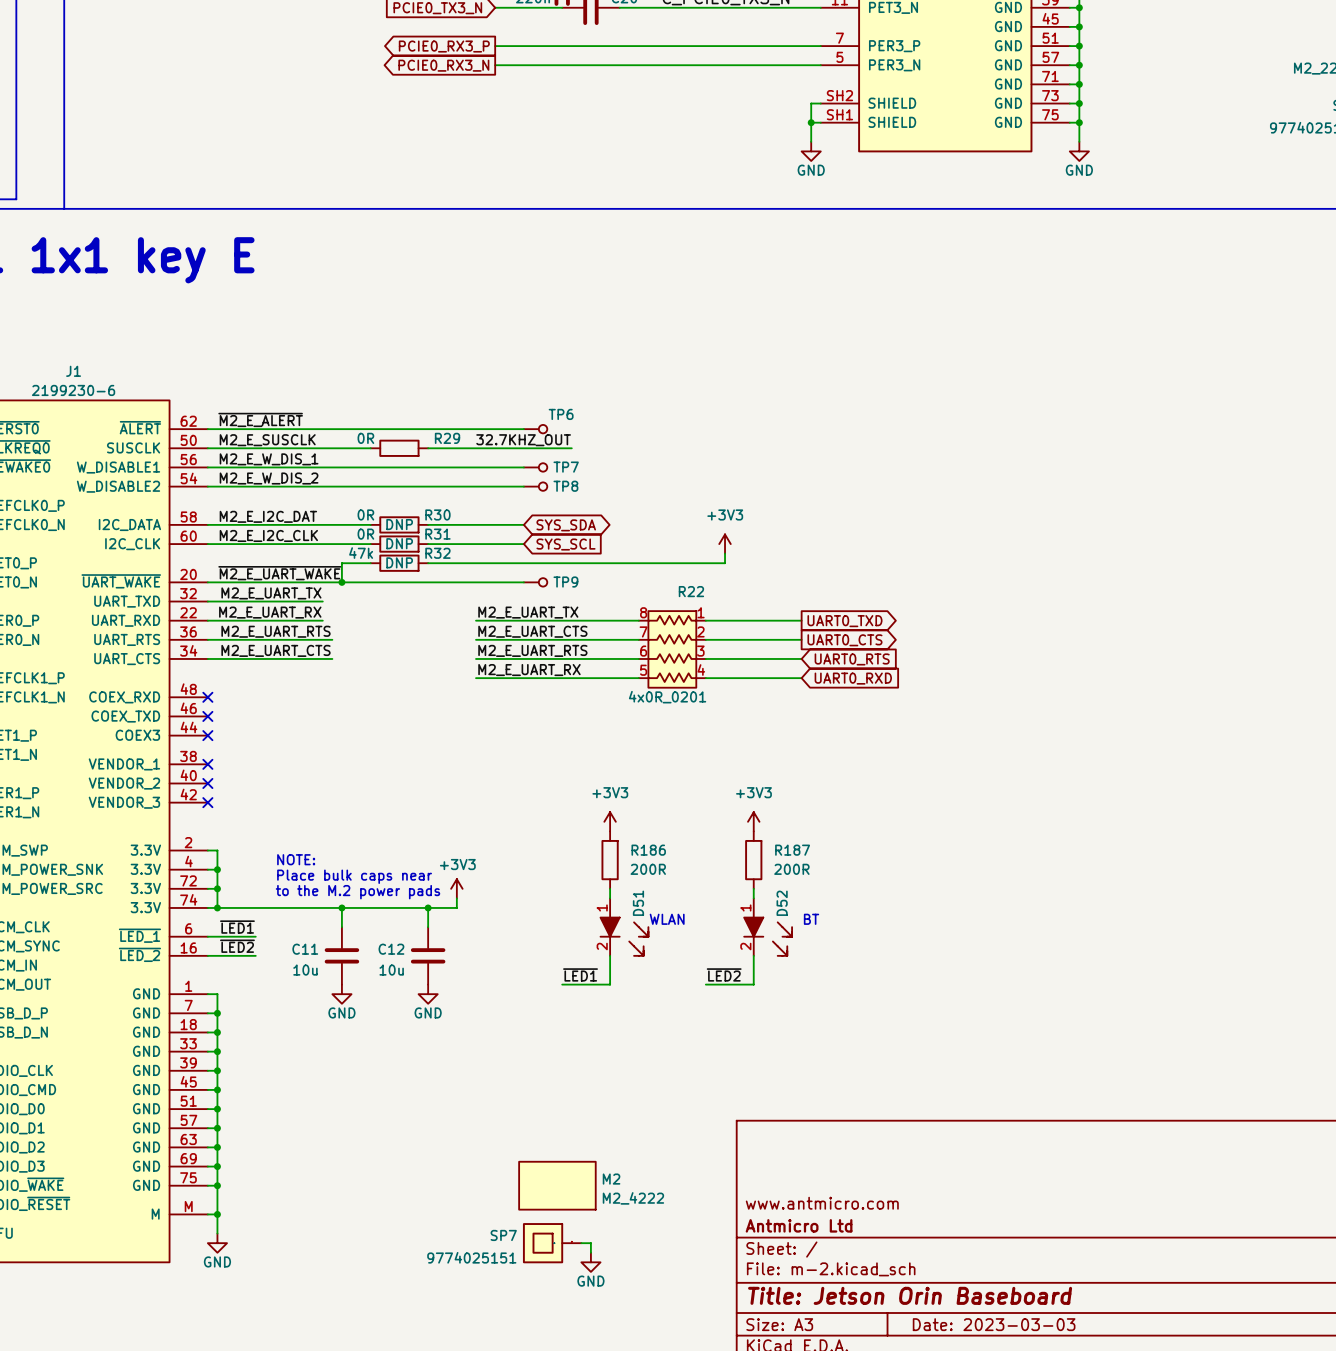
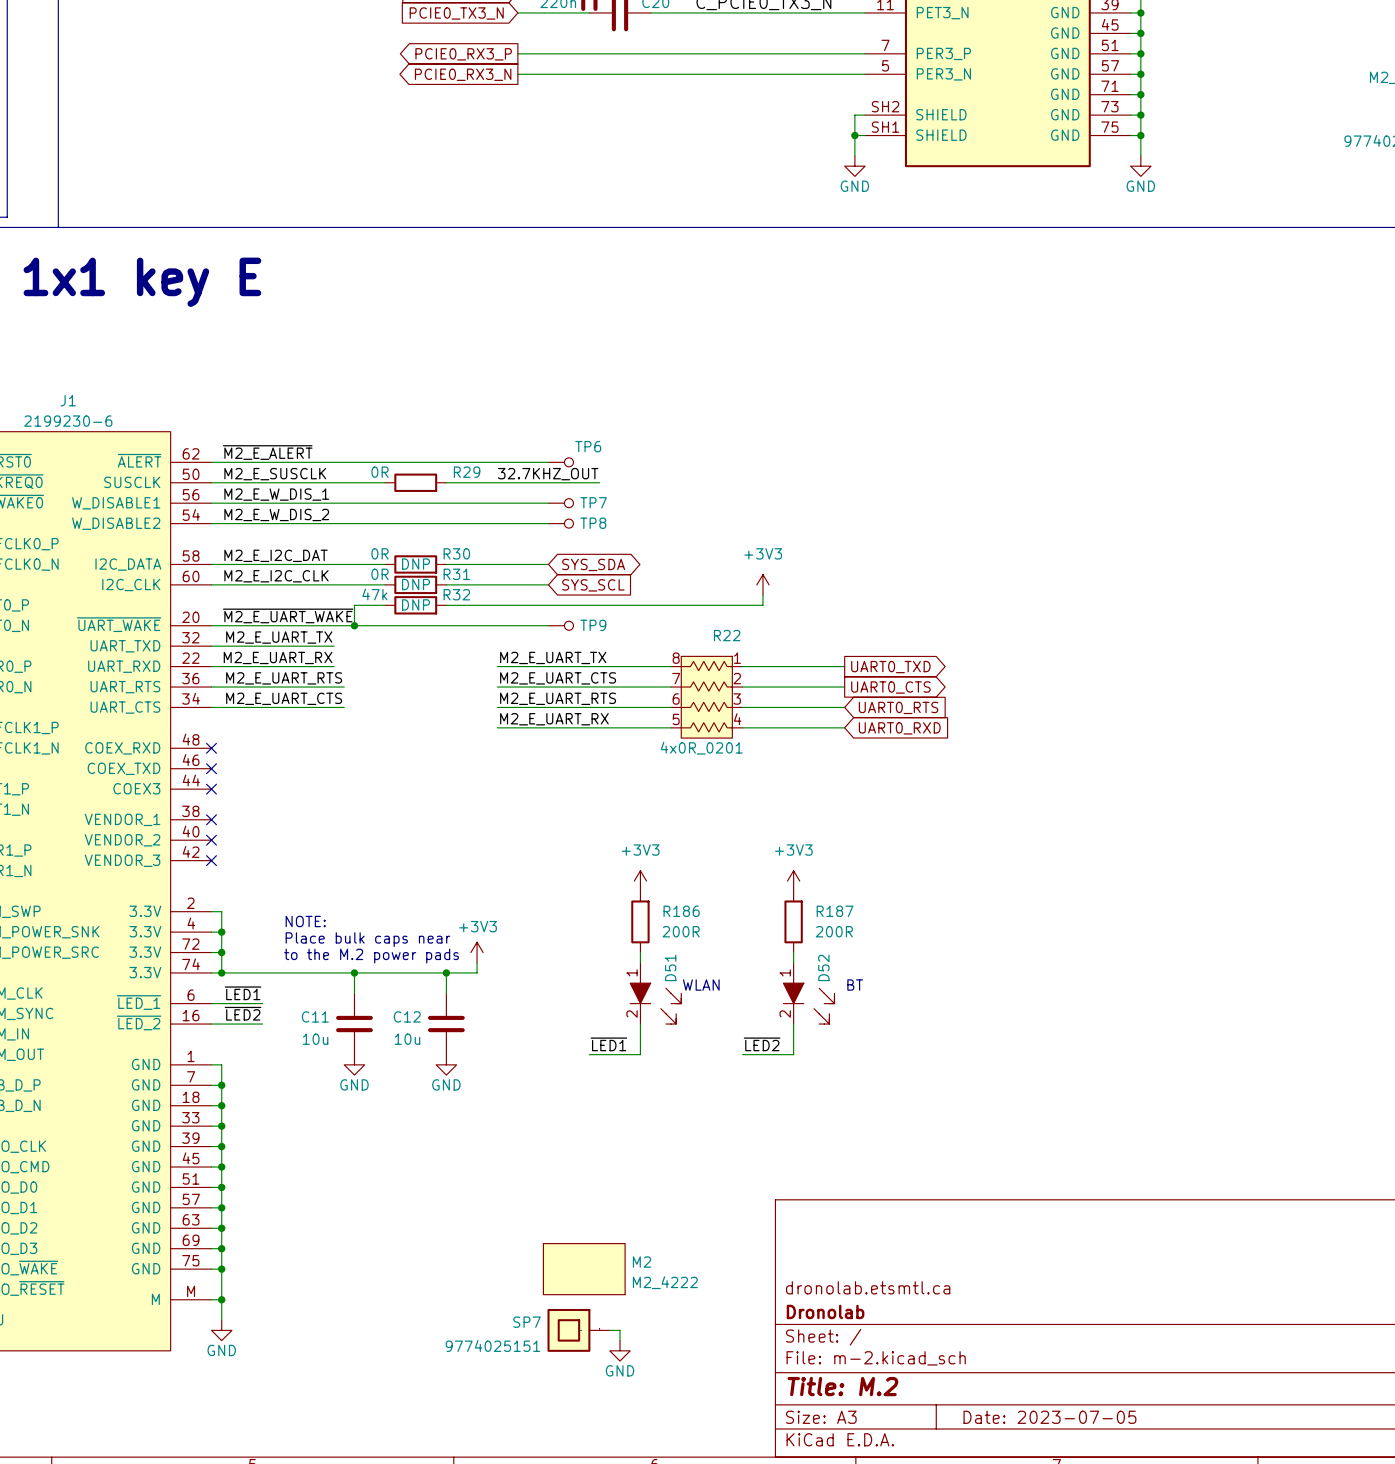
title block: www.antmicro.com (822, 1203) -> dronolab.etsmtl.ca (868, 1287)
title block: Antmicro Ltd (799, 1225) -> Dronolab (825, 1311)
title block: Title: Jetson Orin Baseboard (910, 1295) -> Title: M.2 (842, 1386)
title block: Date: 2023-03-03 (994, 1324) -> Date: 2023-07-05 (1049, 1417)

